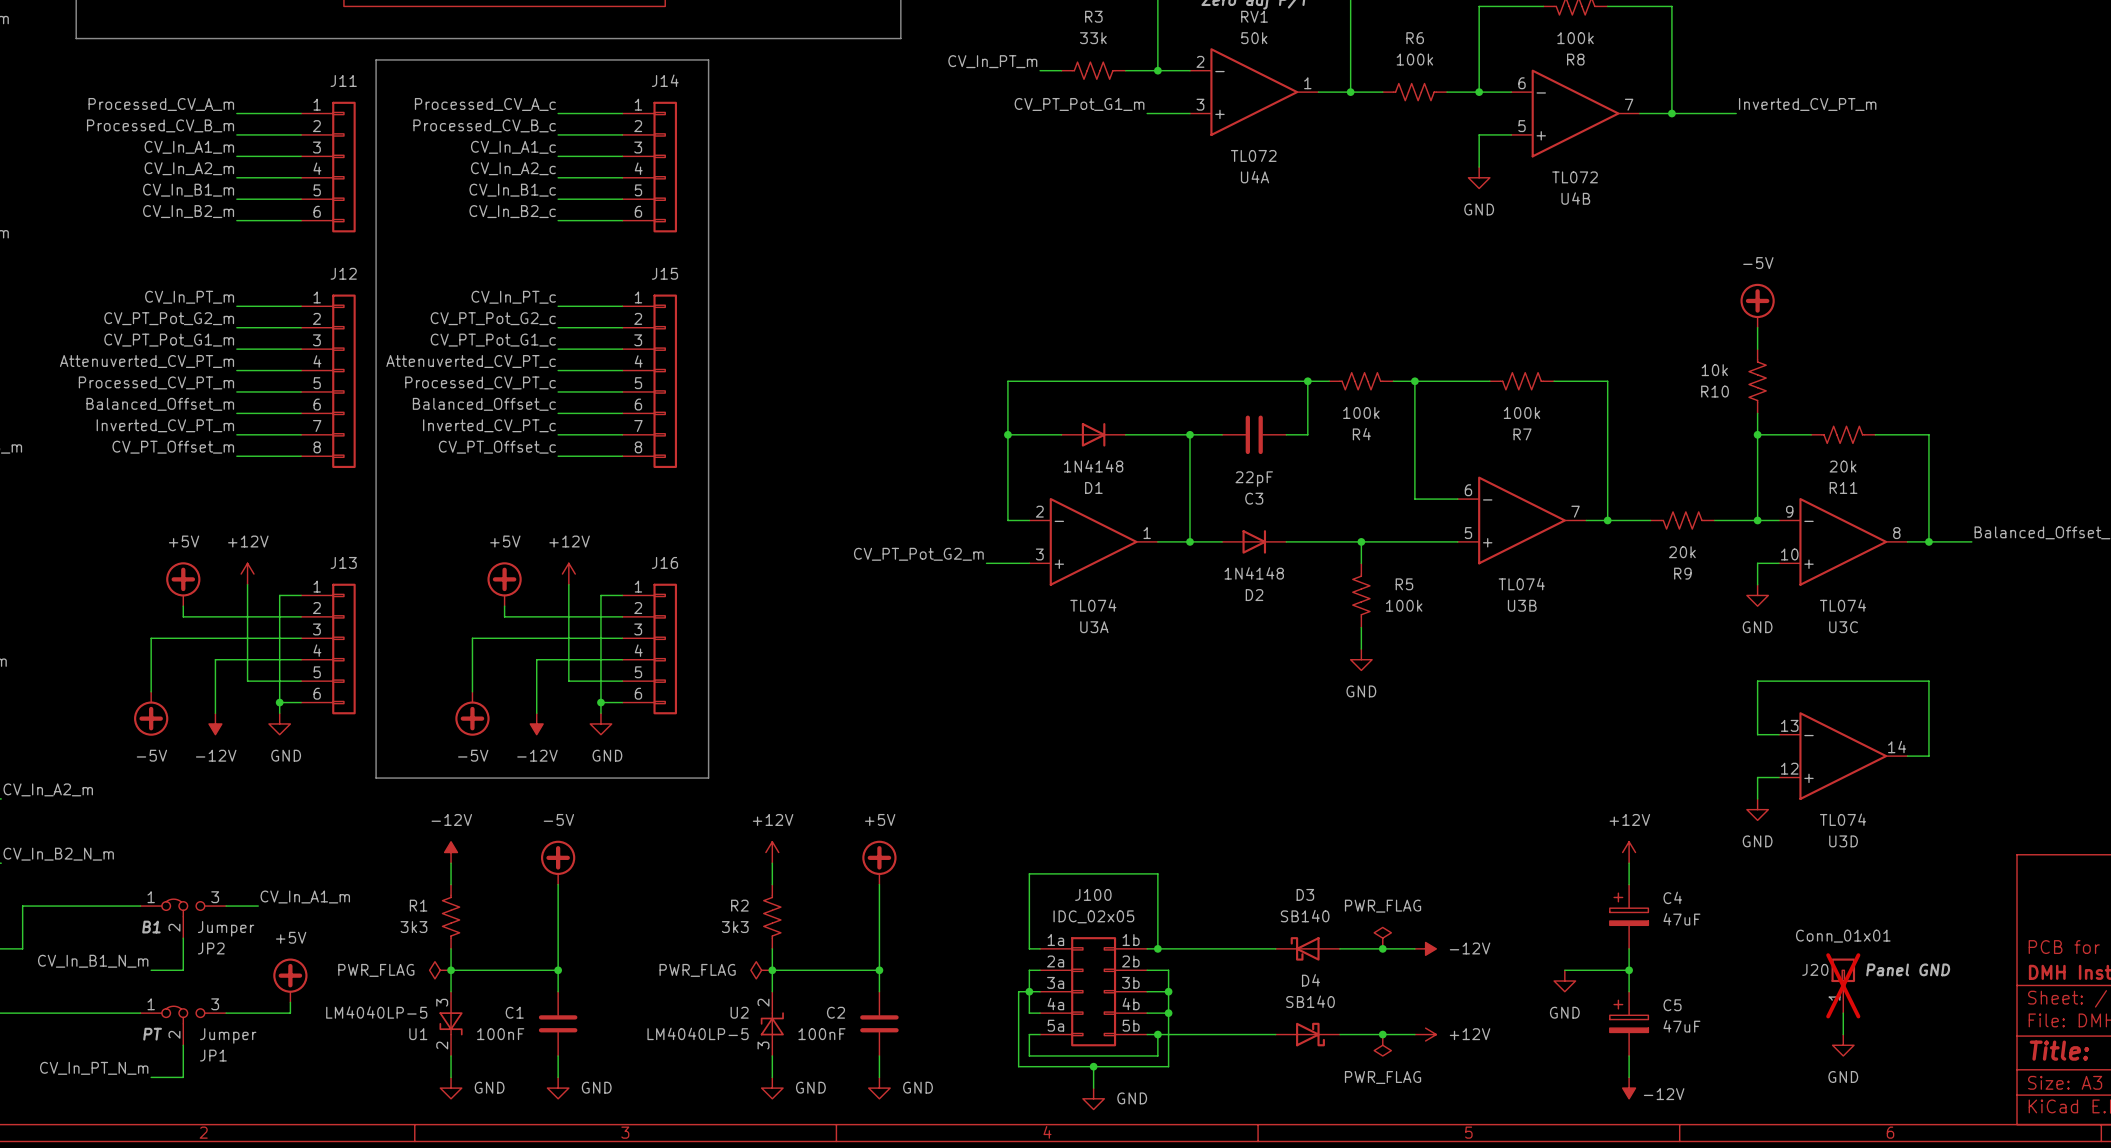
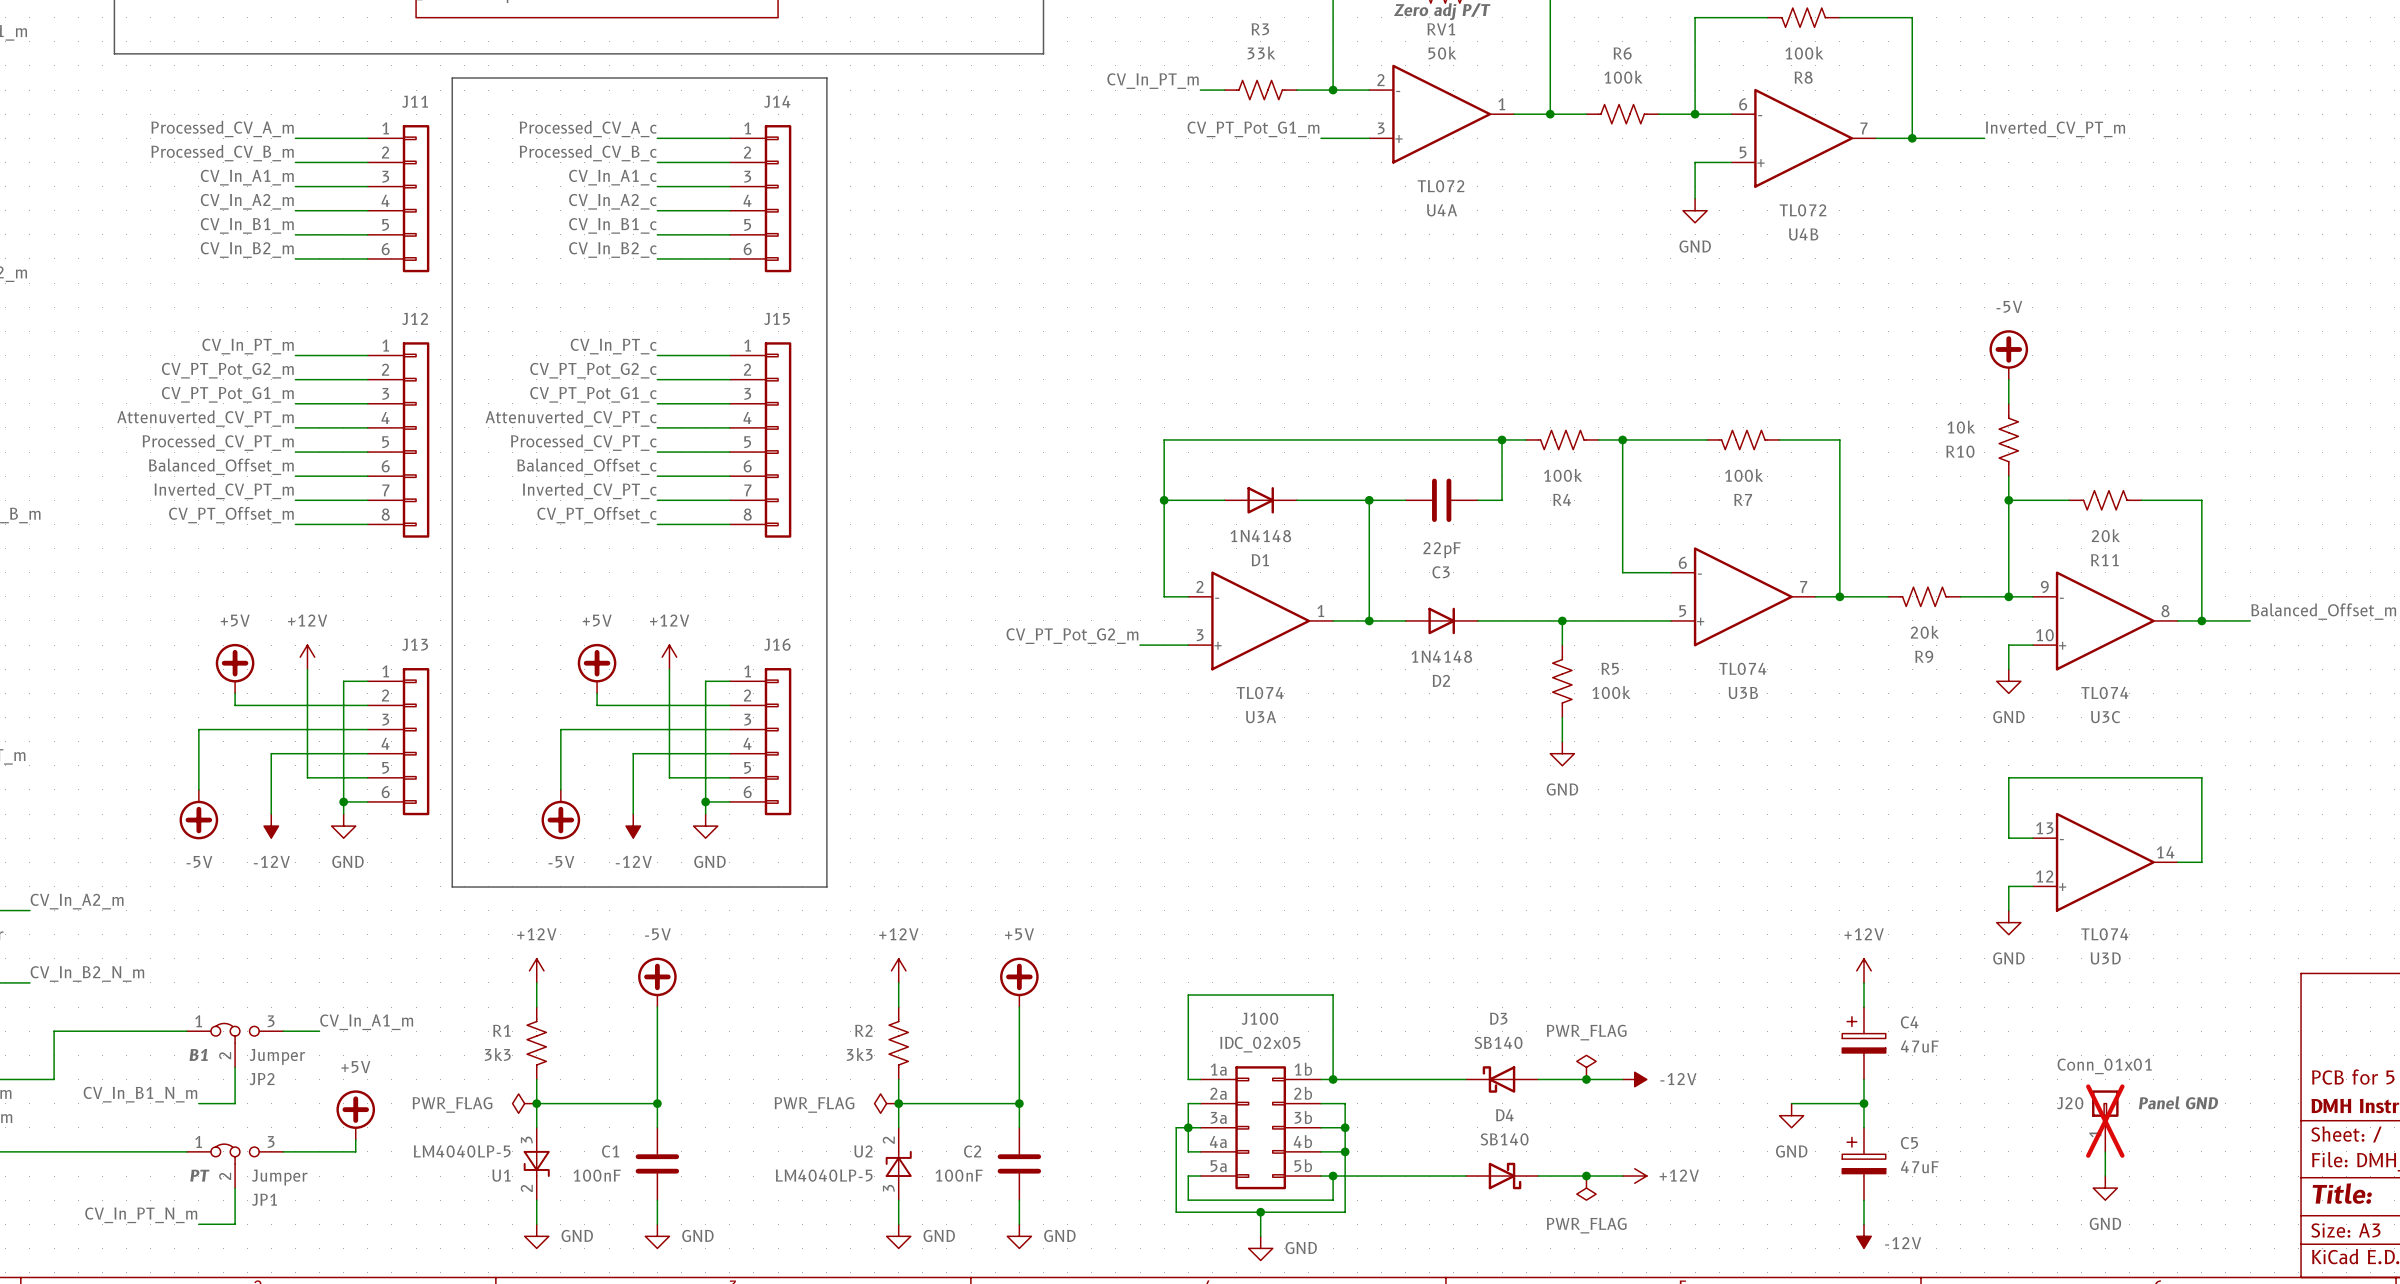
power symbol: -12V (451, 852) -> +12V (536, 970)

